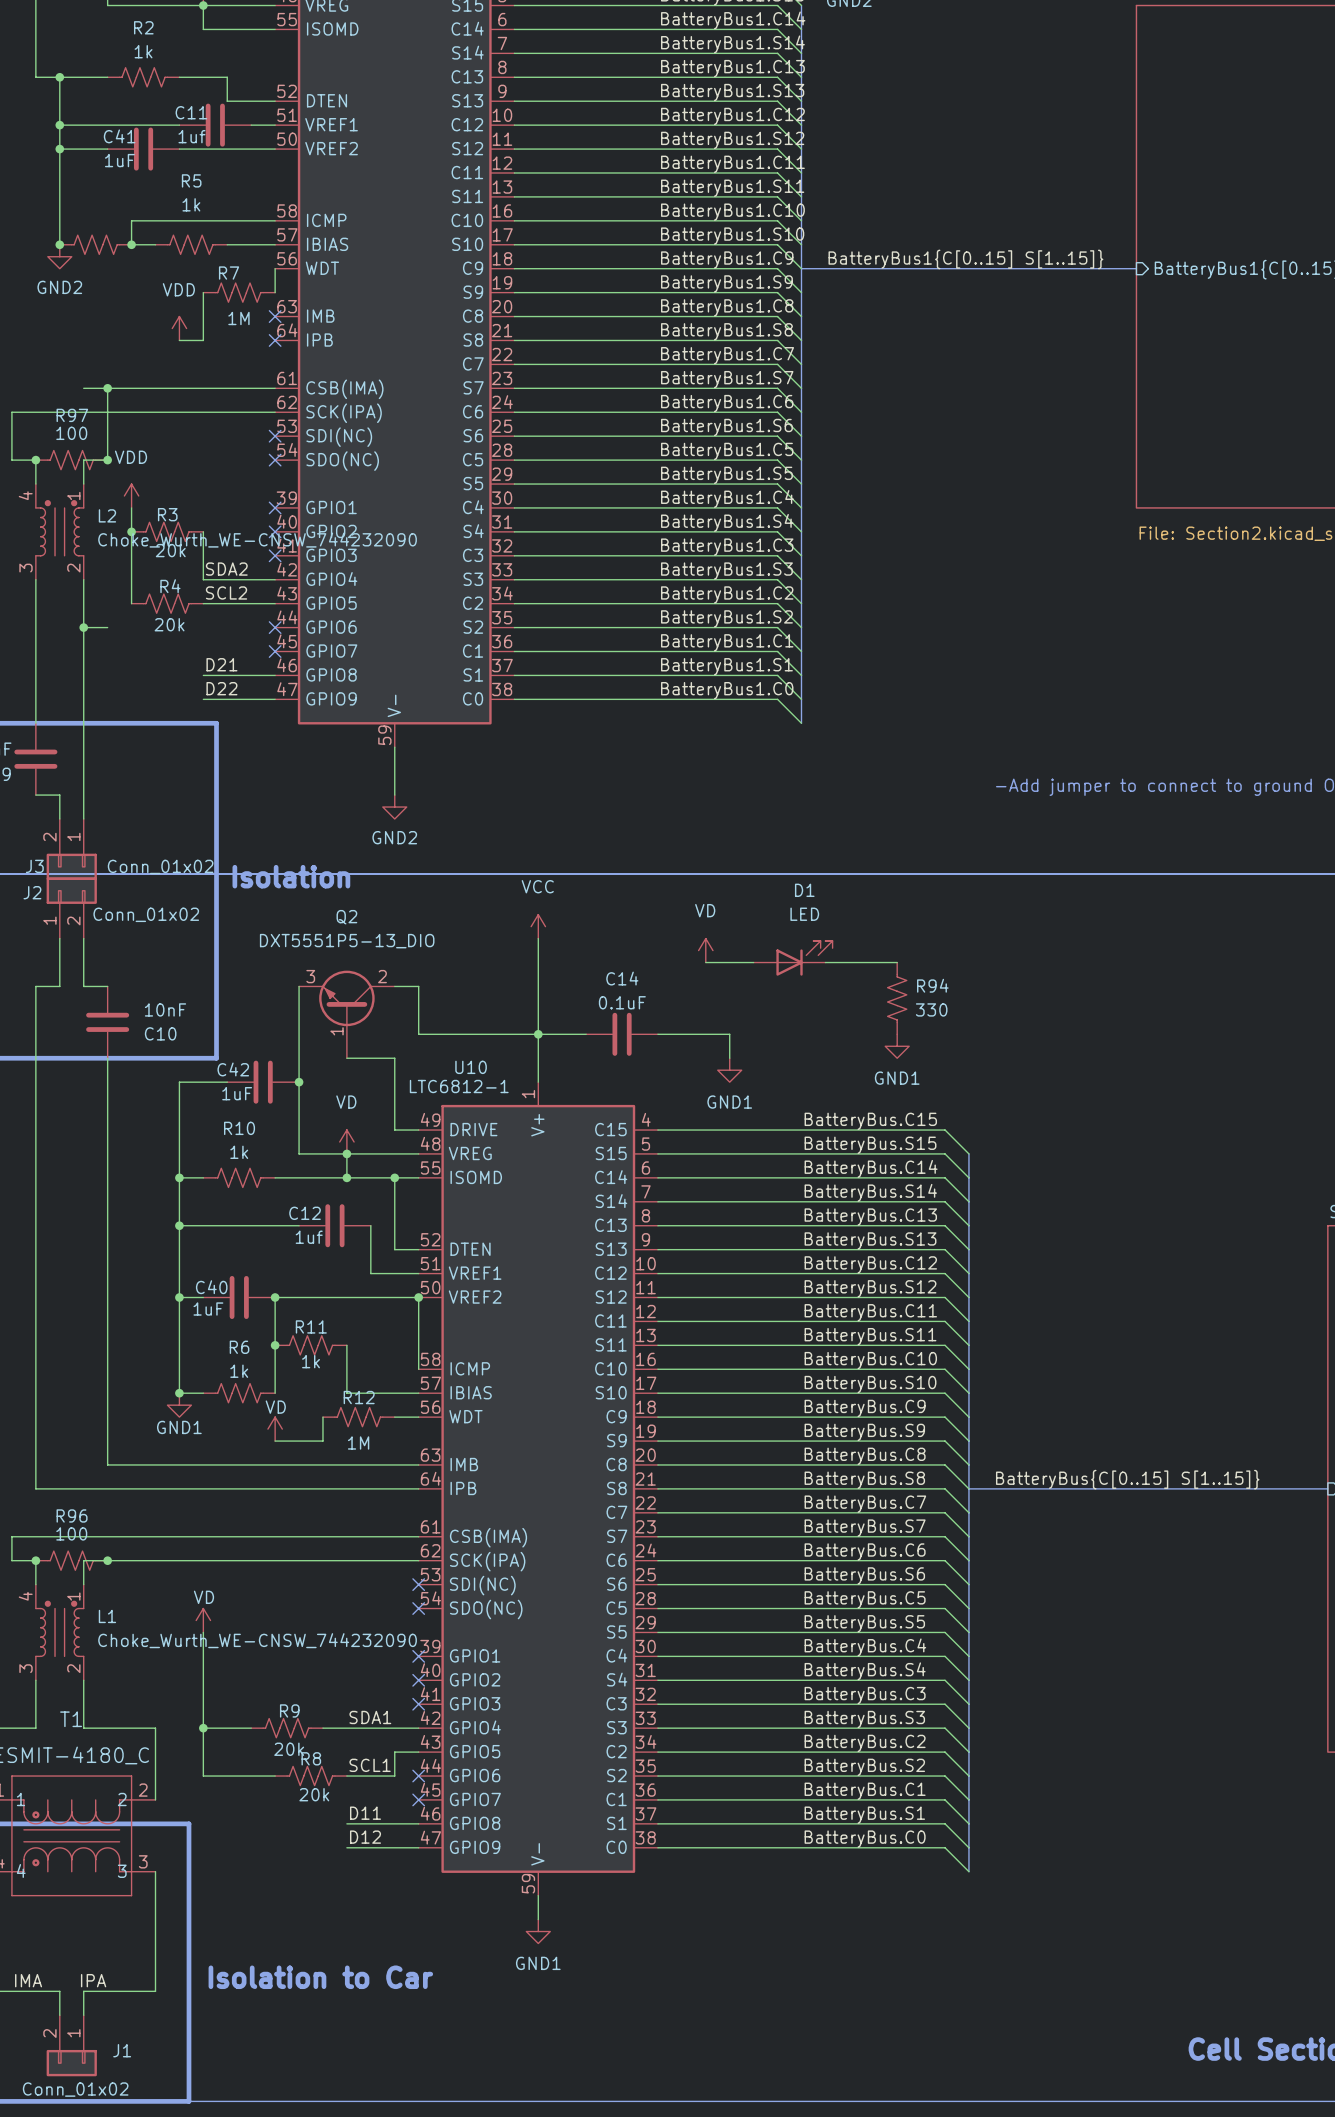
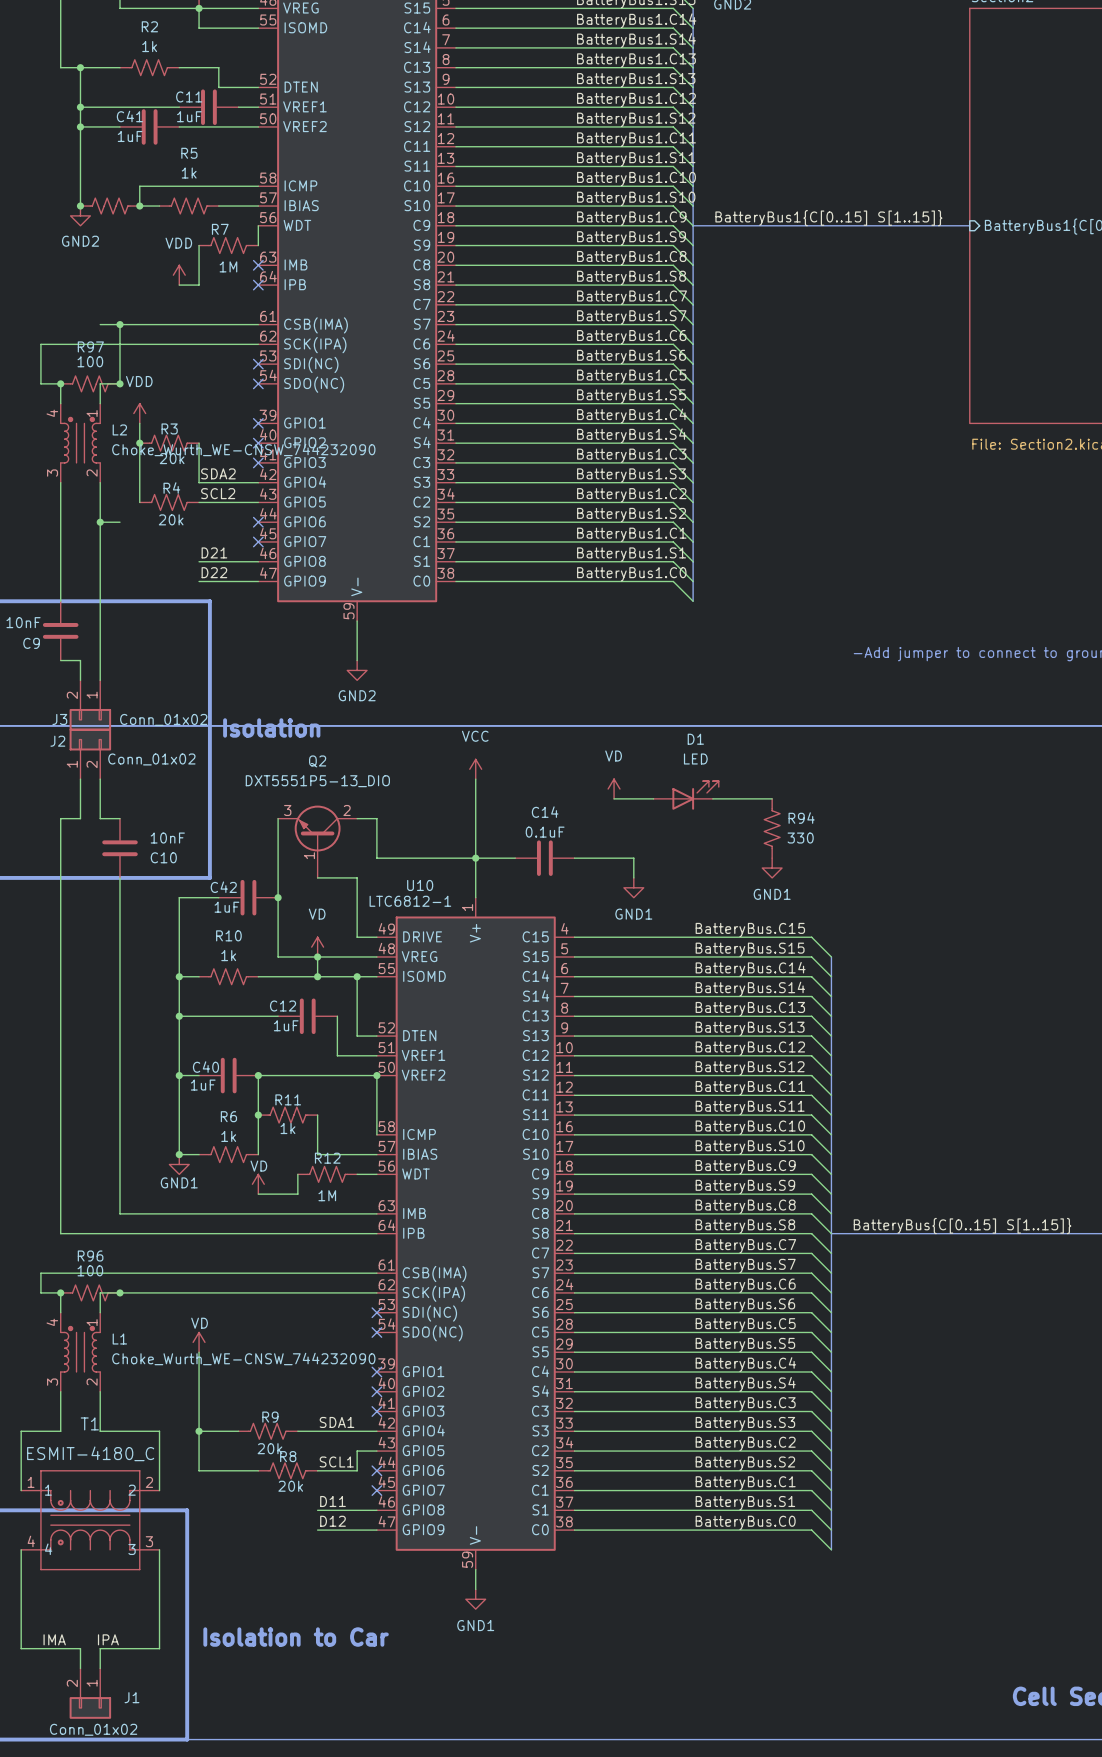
C11 value: 1uf (191, 136) -> 1uF (189, 116)
C12 value: 1uf (309, 1237) -> 1uF (286, 1025)

